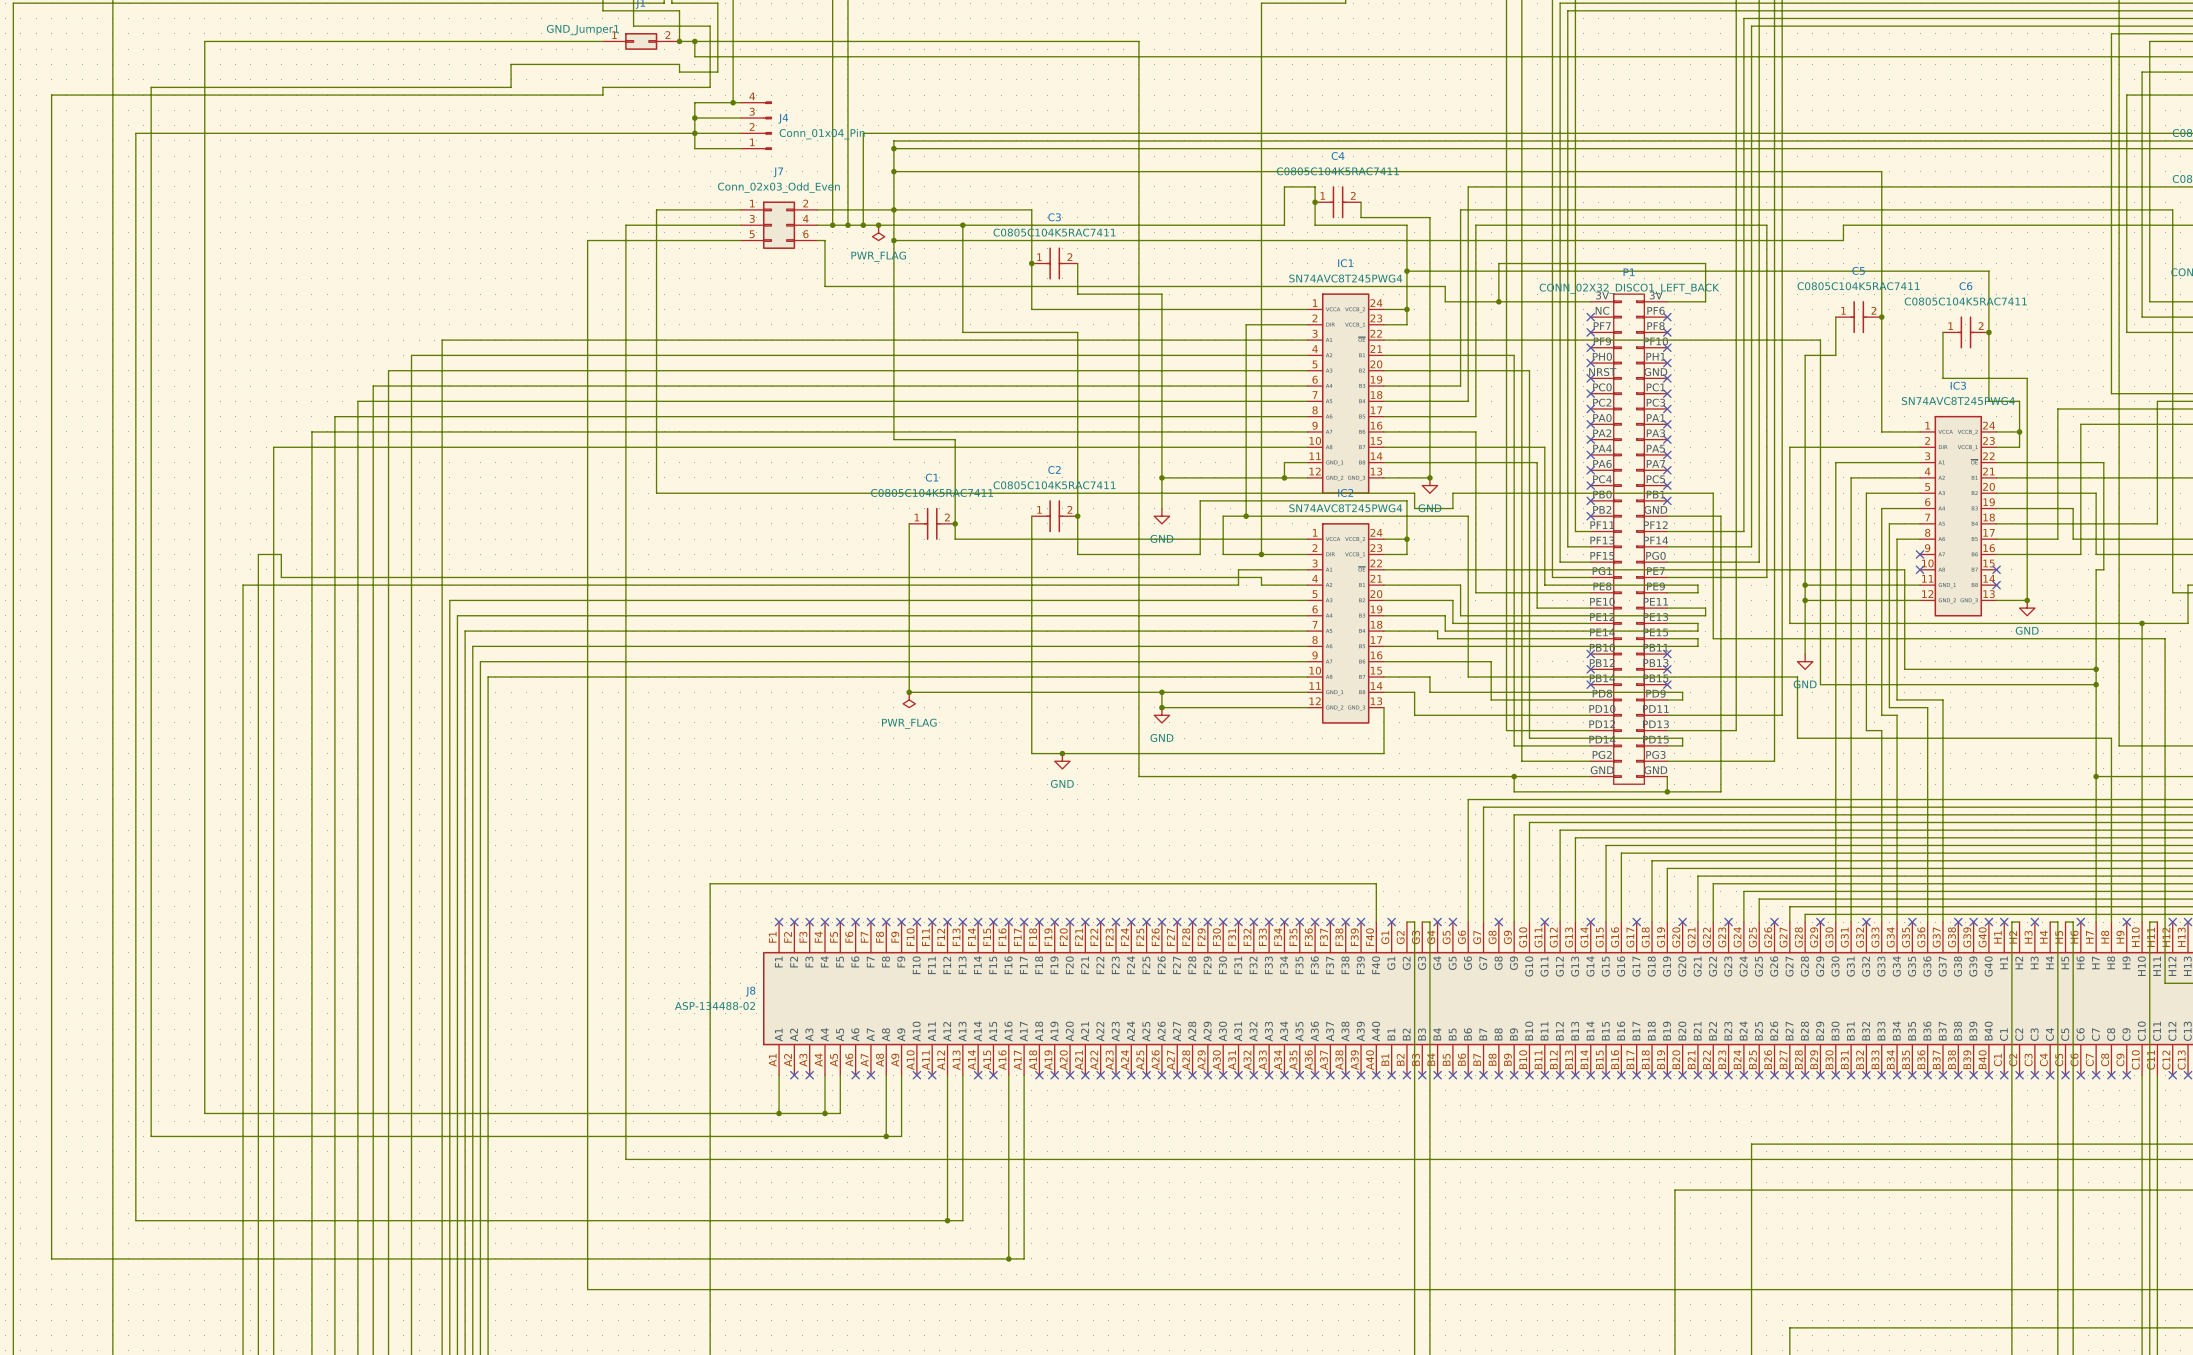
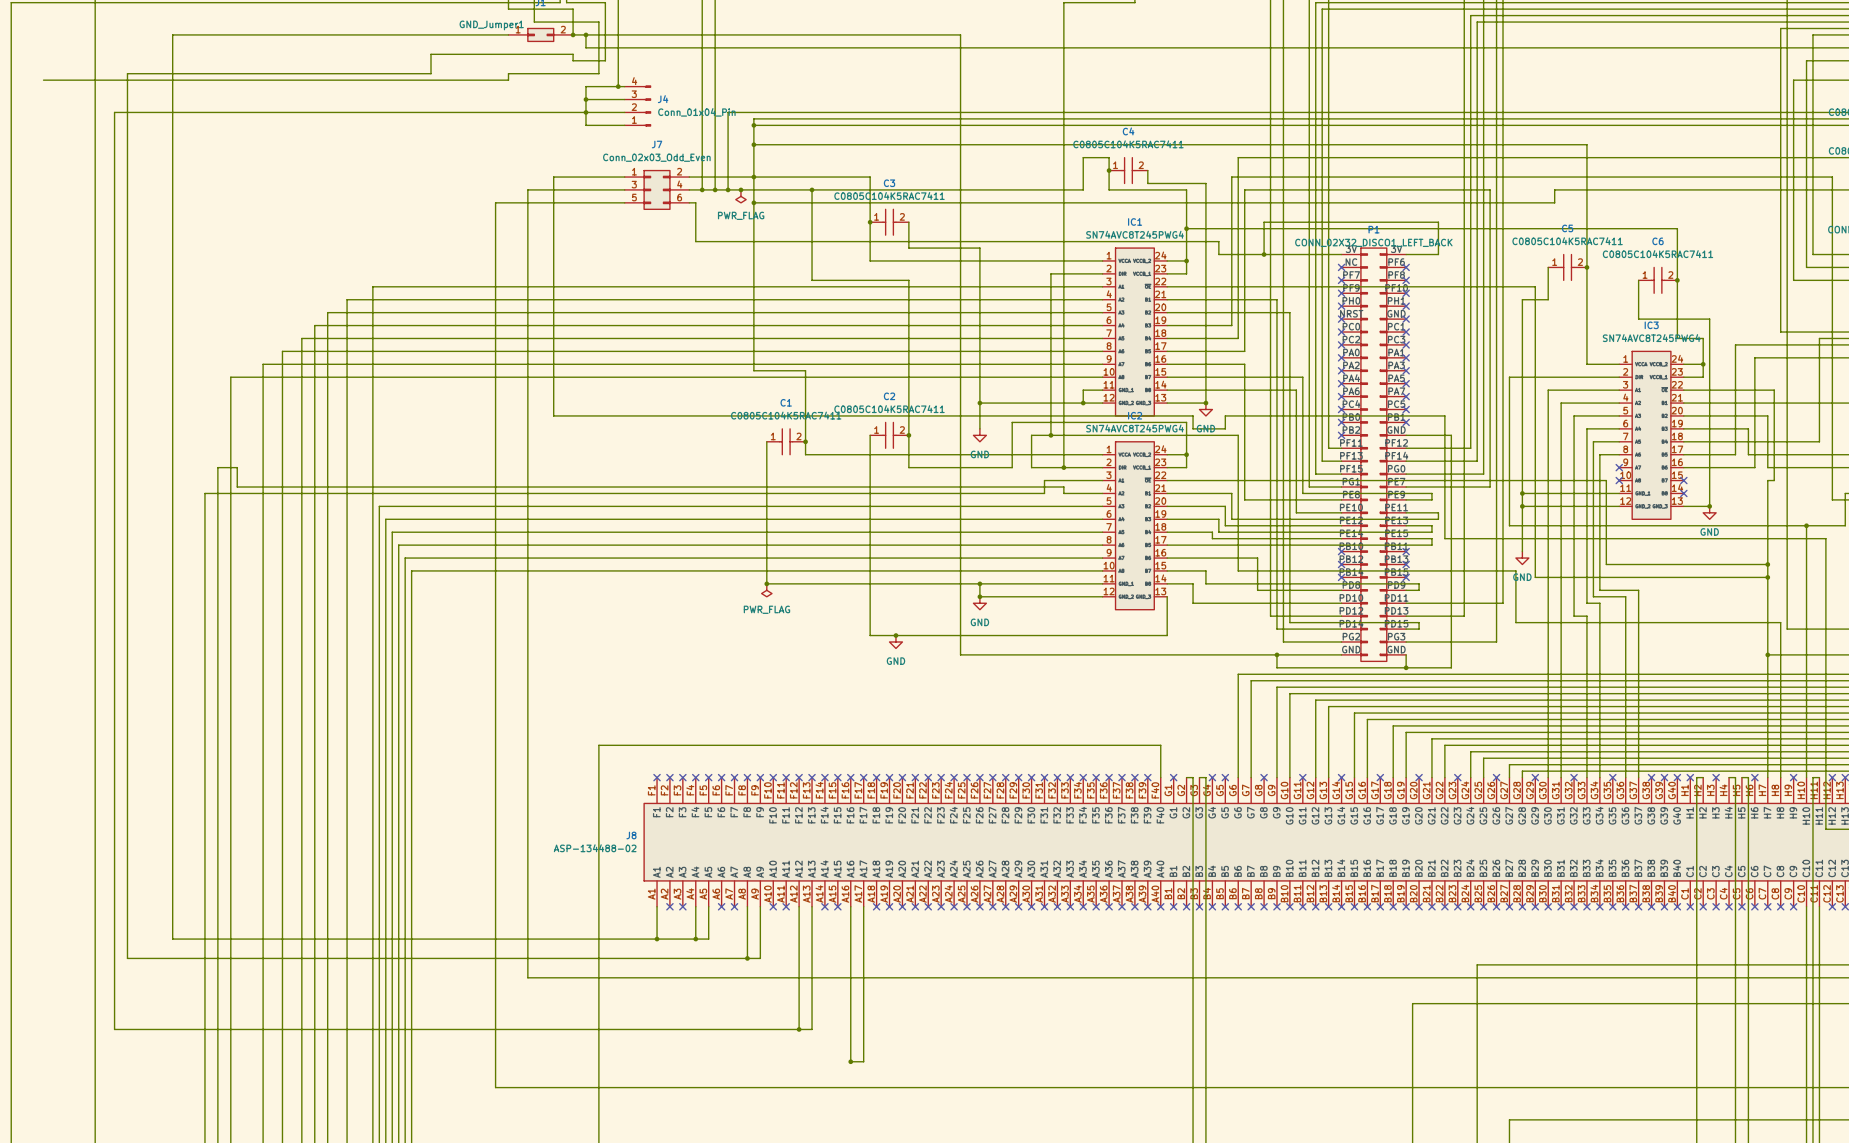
wire: (51, 95) (51, 1258) (1008, 1258) -> none

